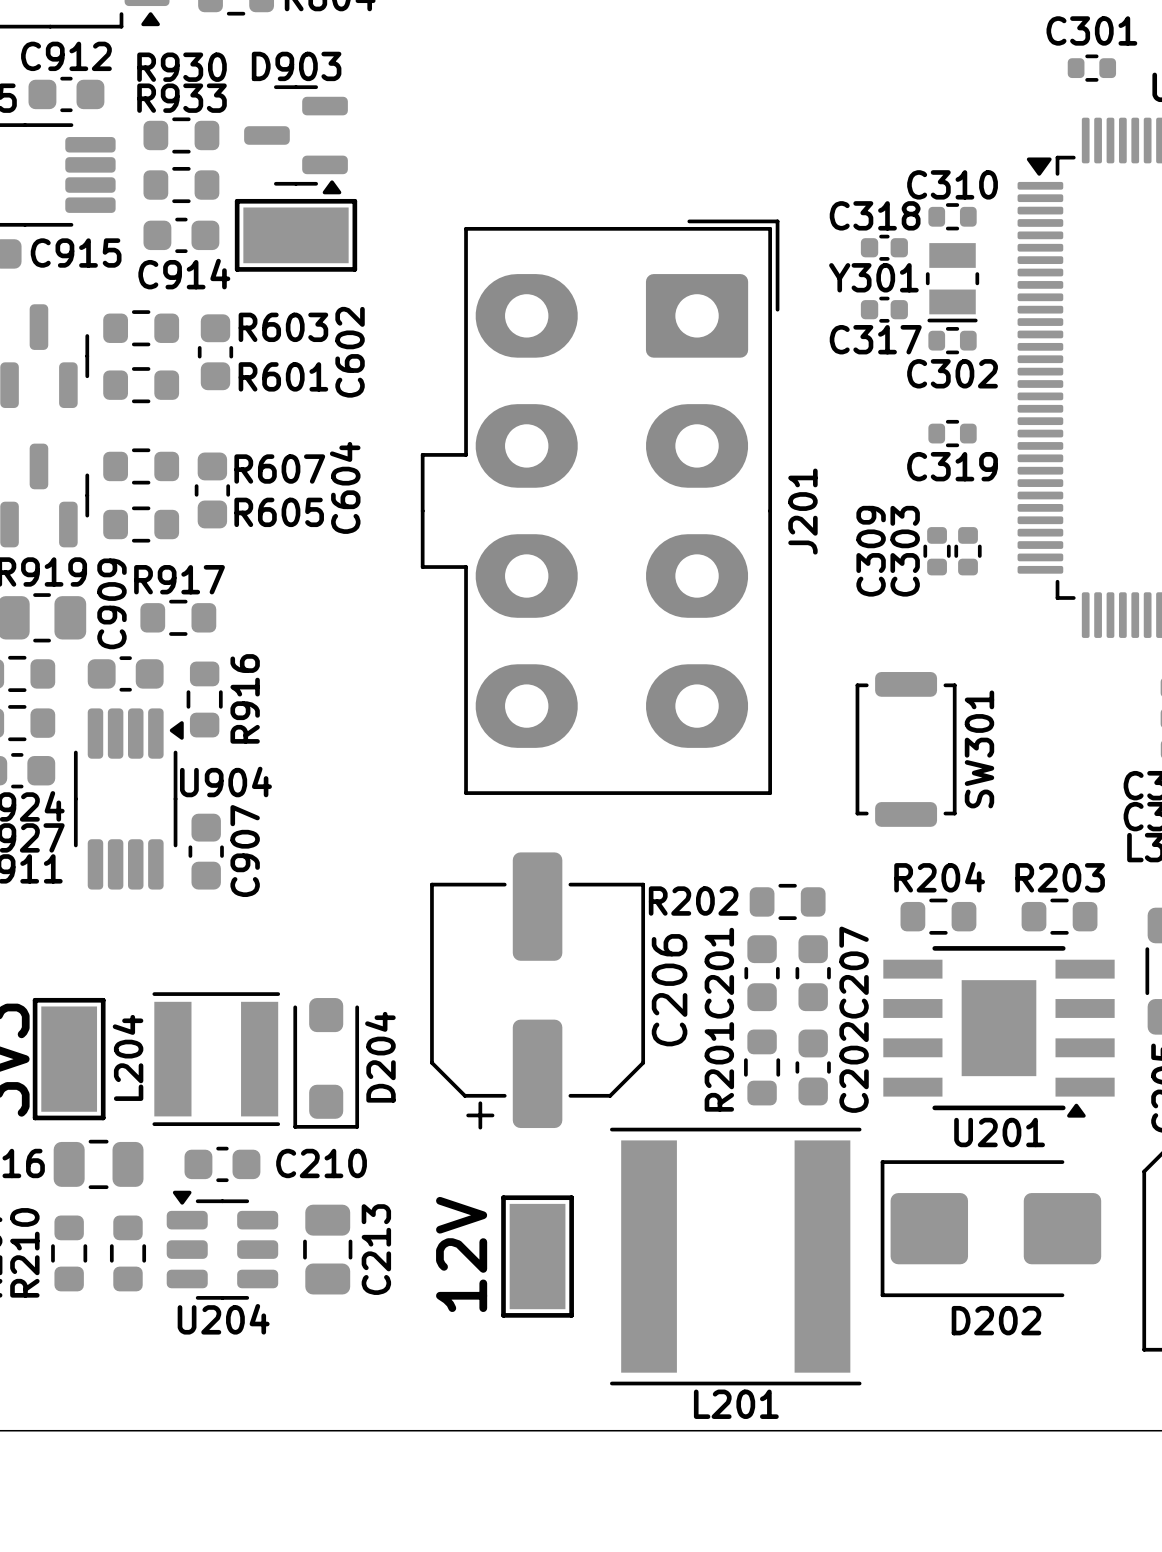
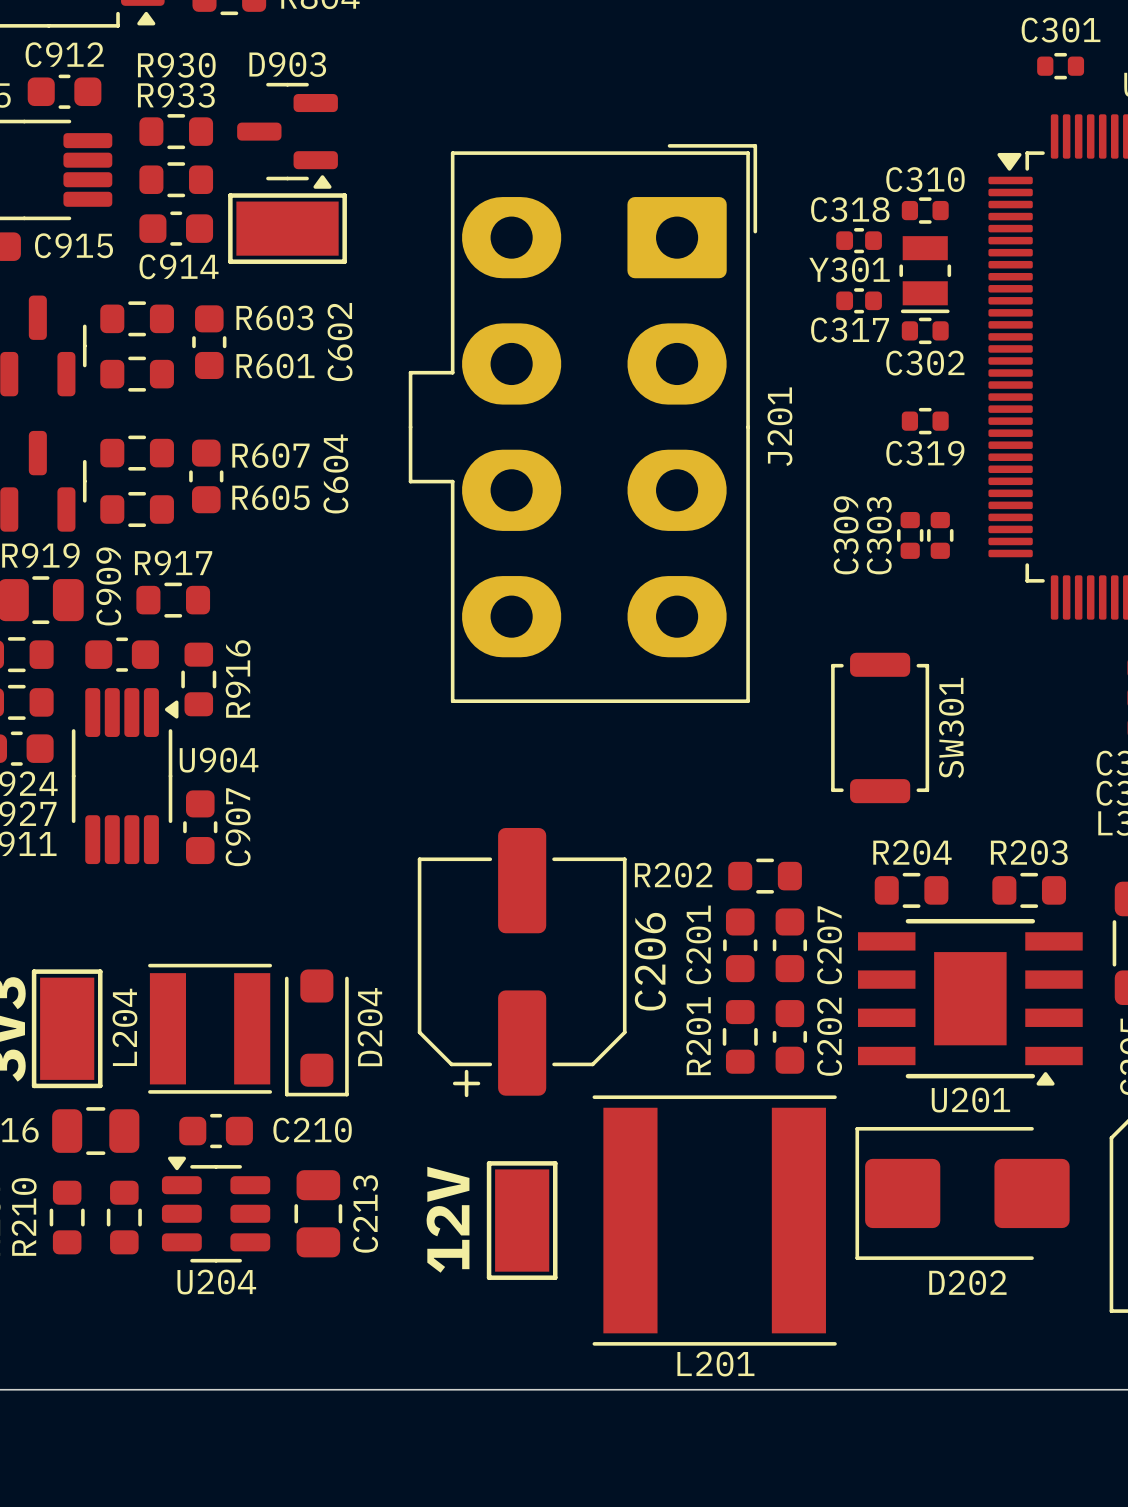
J201 position: (600, 507) -> (582, 423)

